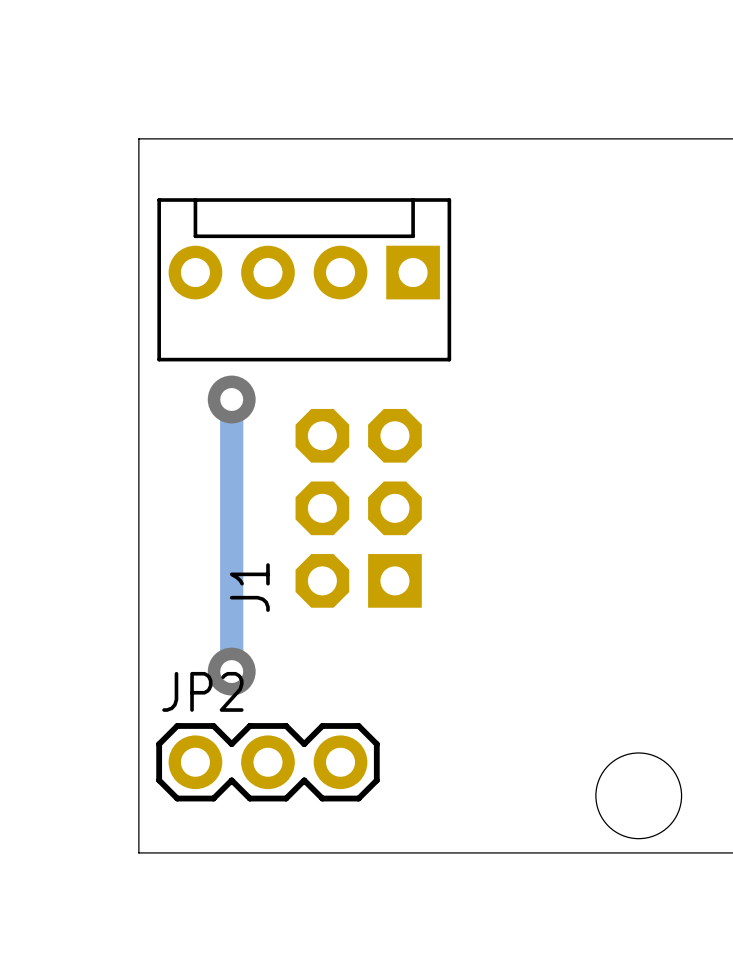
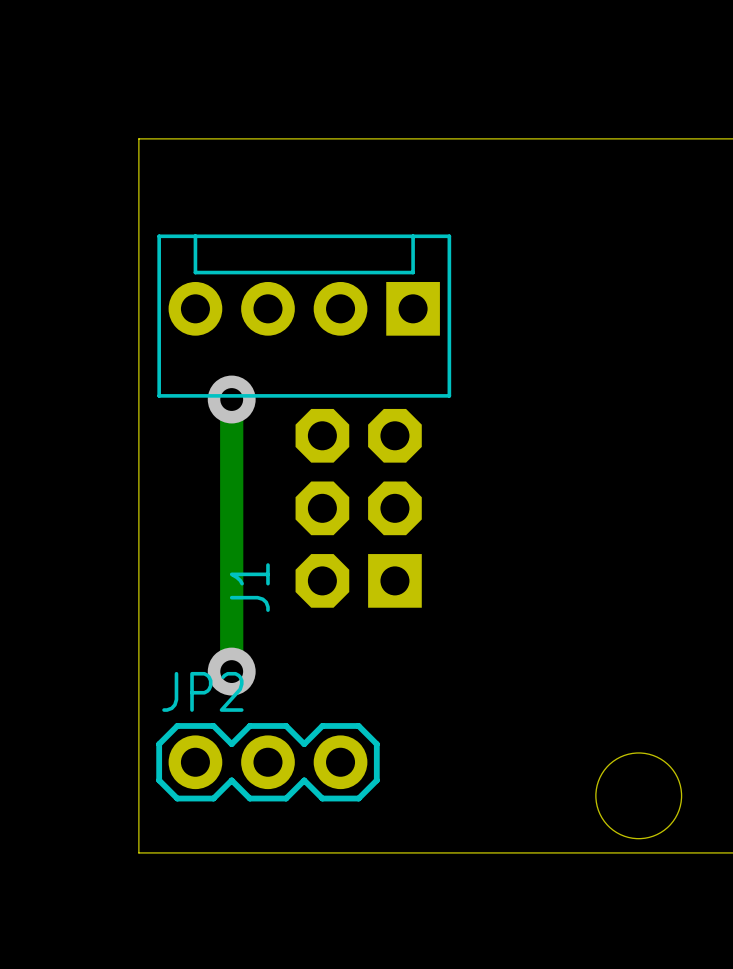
part position: (304, 279) -> (304, 316)

